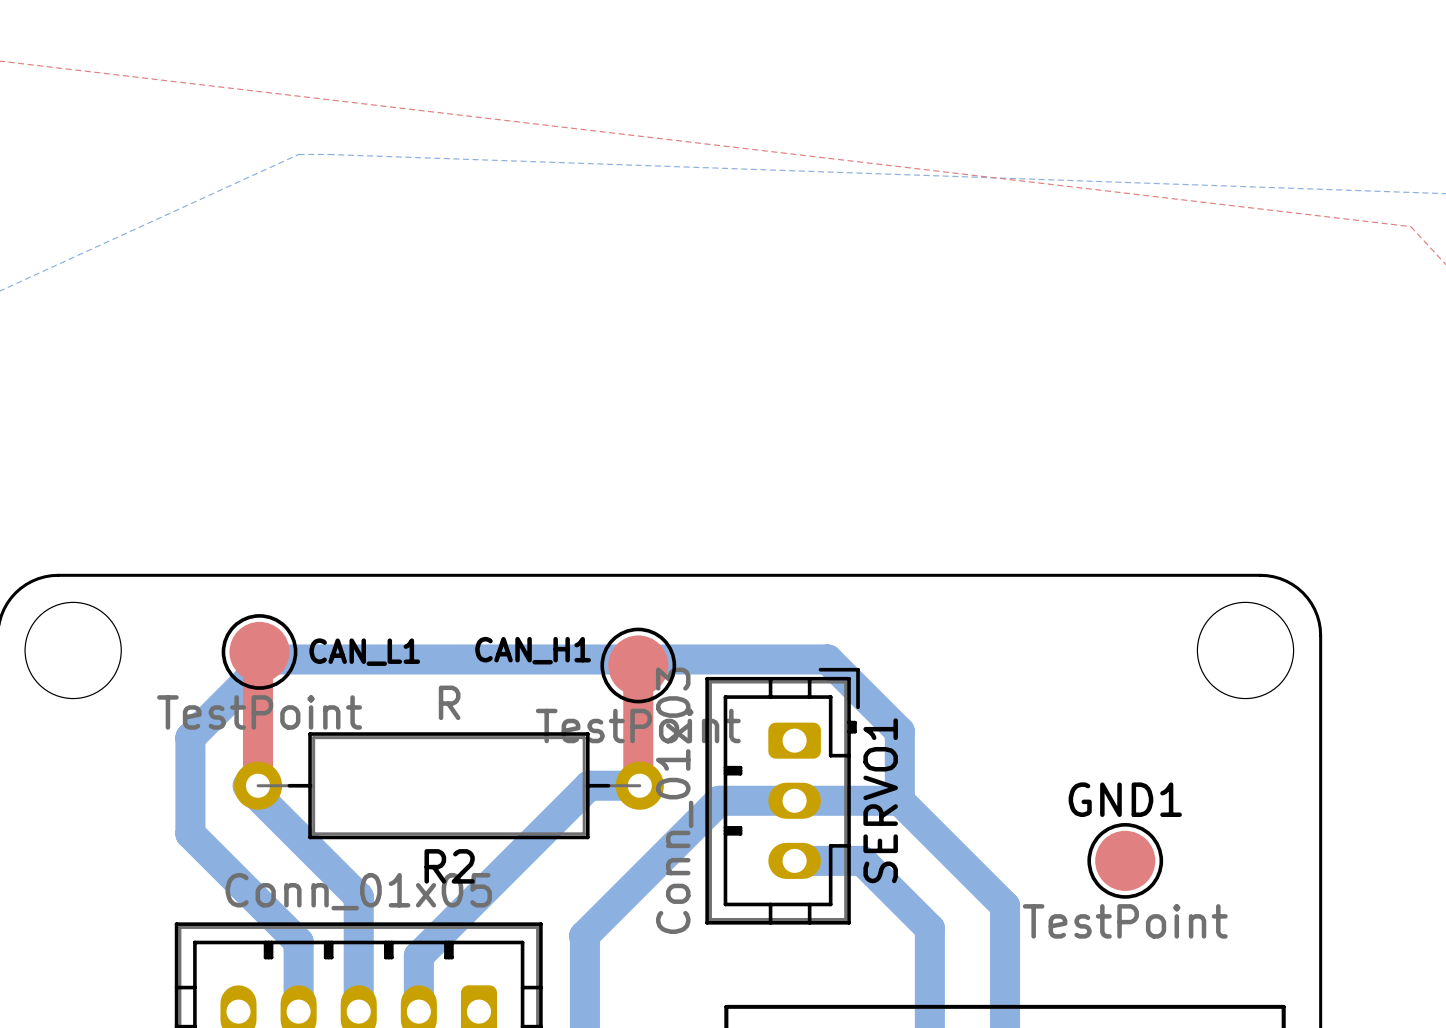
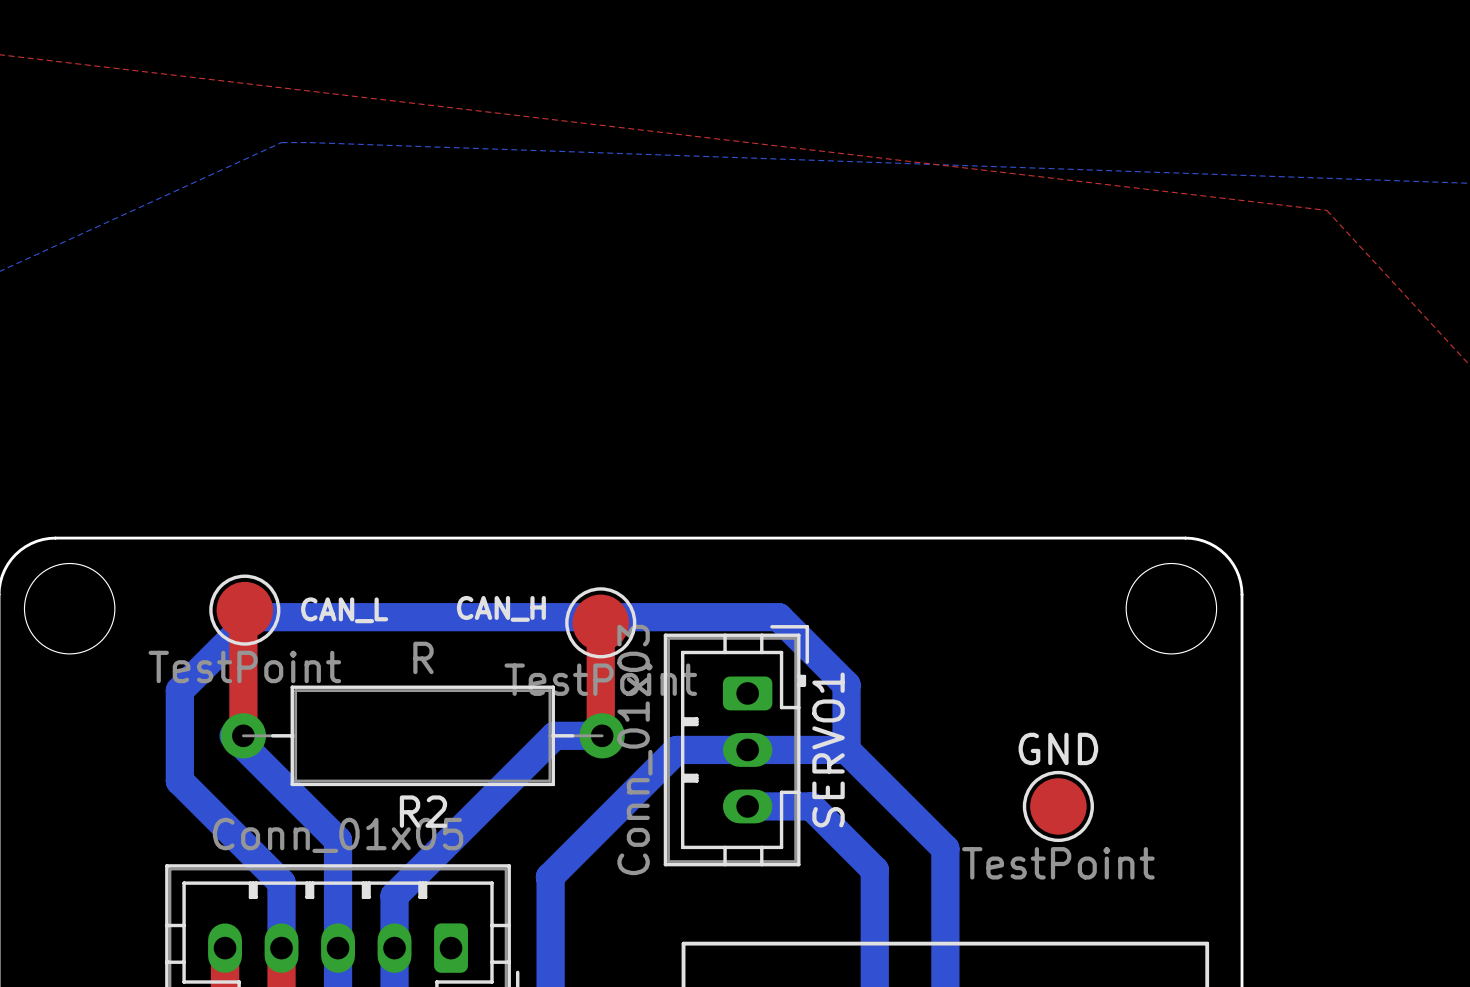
CAN_H1 name: CAN_H1 (533, 650) -> CAN_H (501, 608)
CAN_L1 name: CAN_L1 (364, 652) -> CAN_L (344, 610)
GND1 name: GND1 (1125, 799) -> GND (1058, 748)

